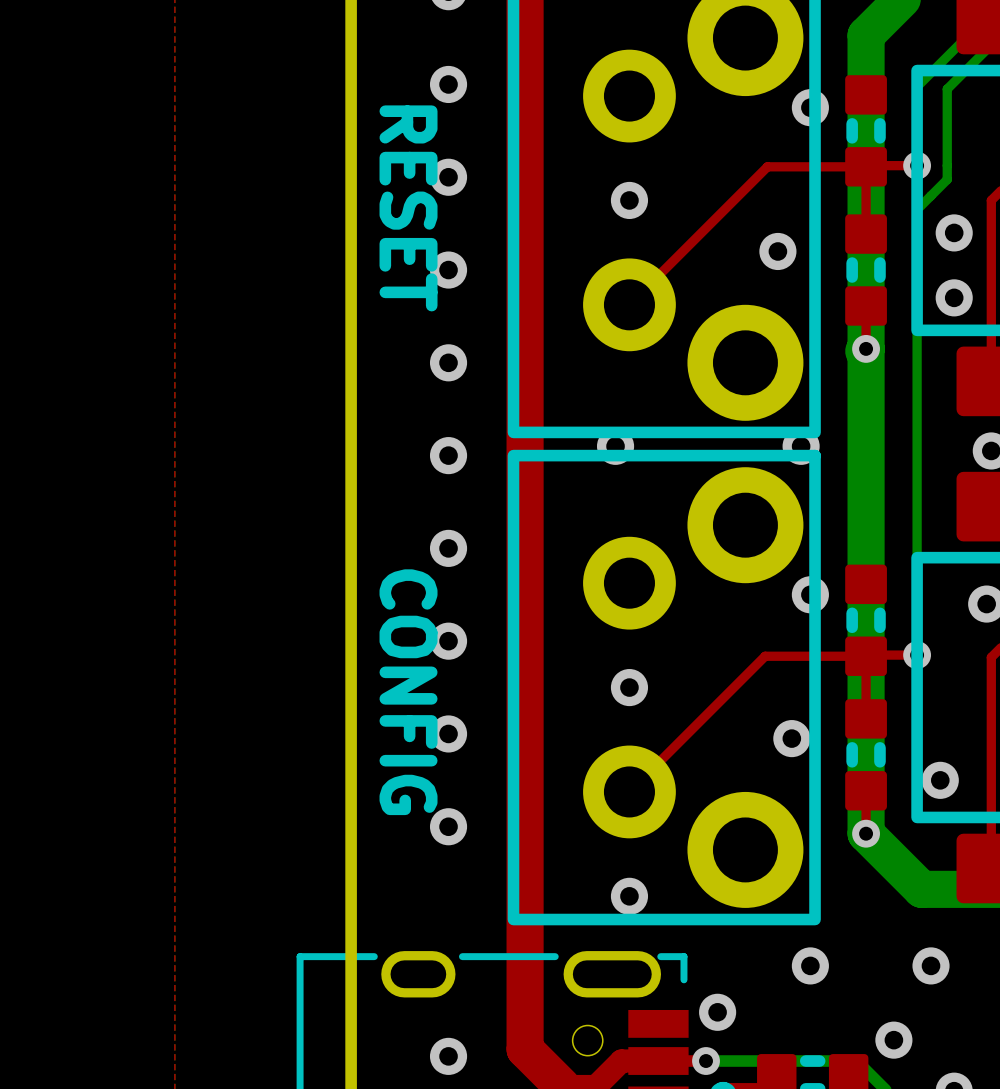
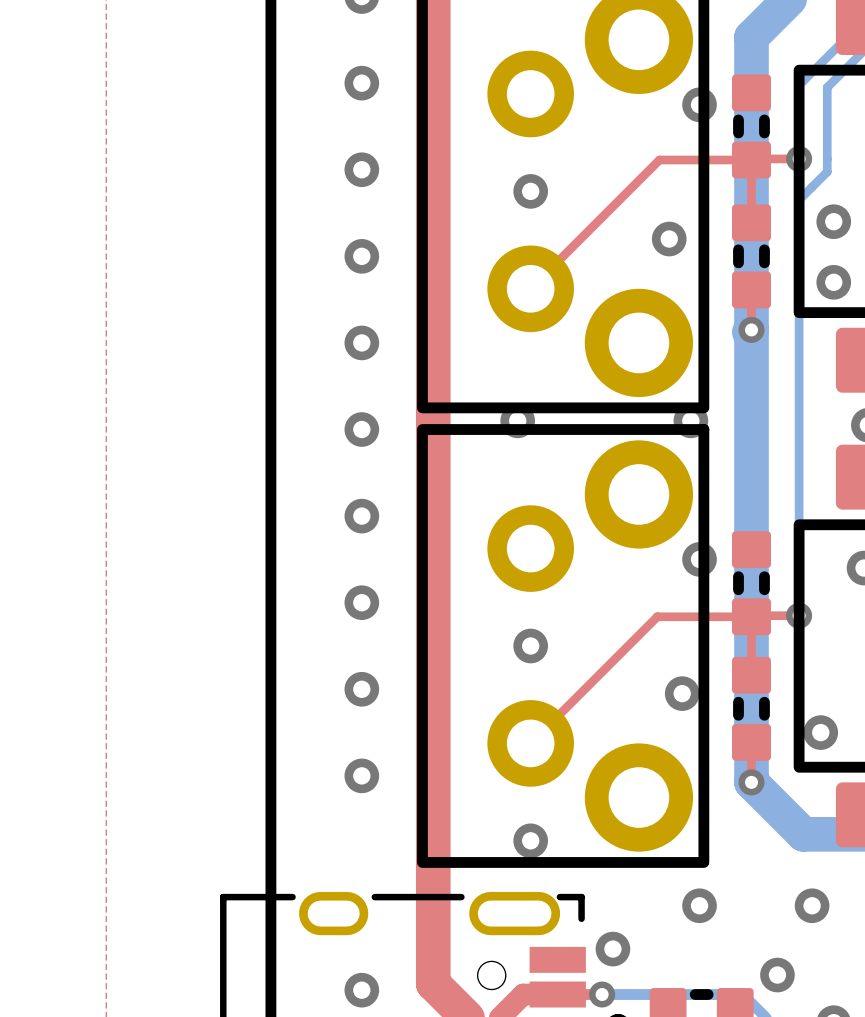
text: RESET (408, 208) -> none
text: CONFIG (408, 692) -> none

